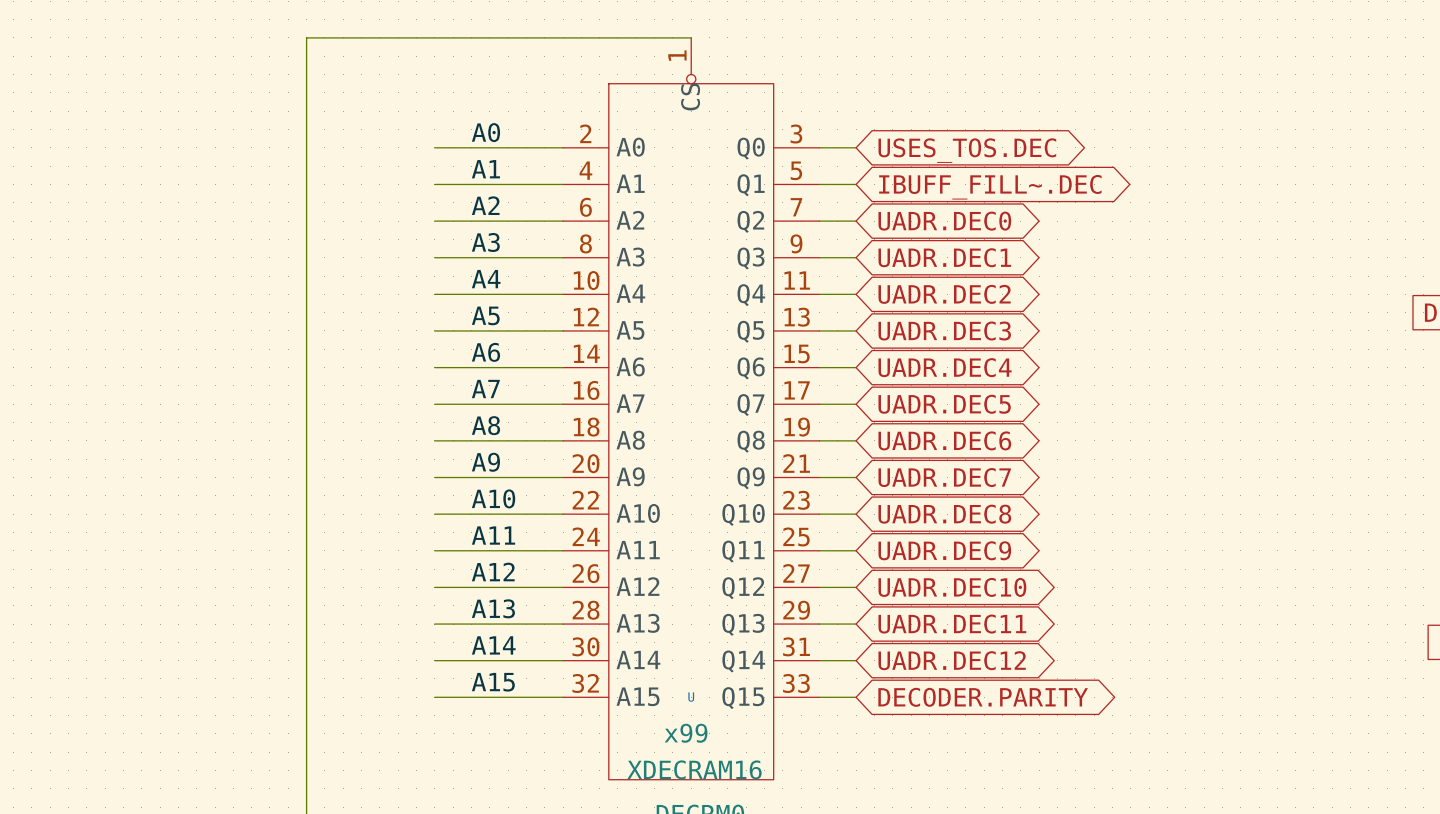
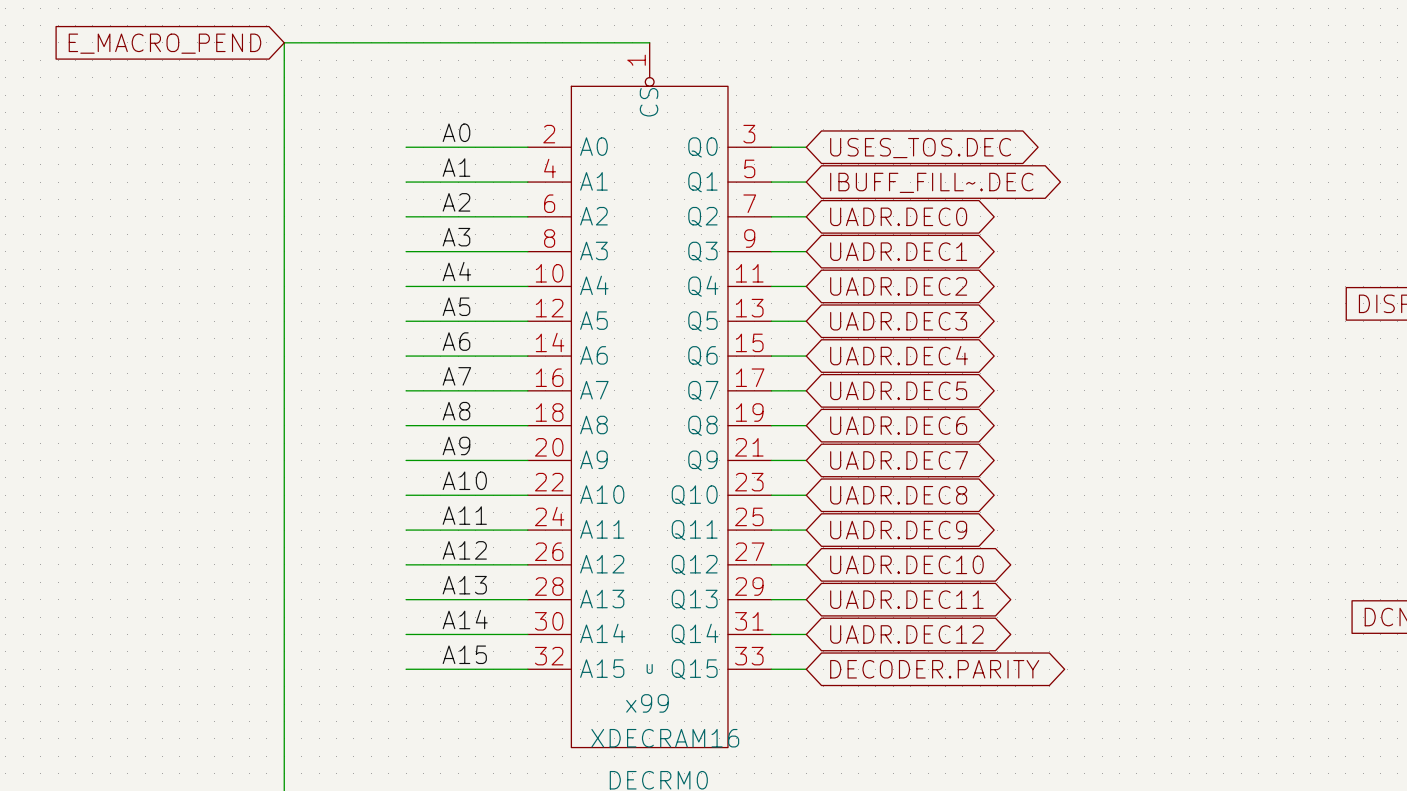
global label: none -> E_MACRO_PEND (164, 43)

